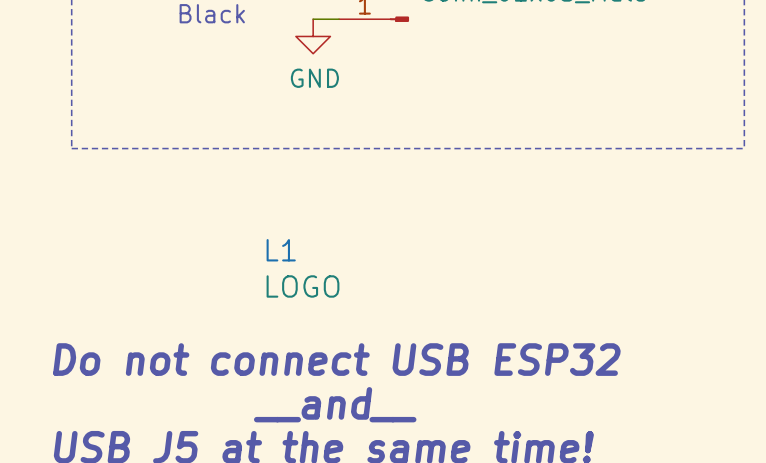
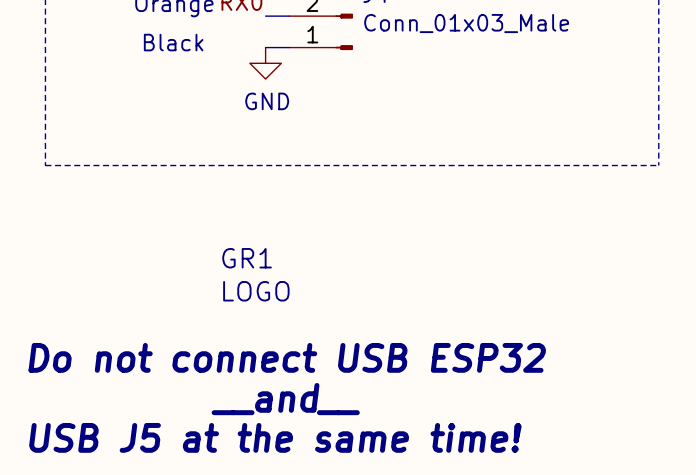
L1 name: L1 (281, 250) -> GR1 (247, 258)

